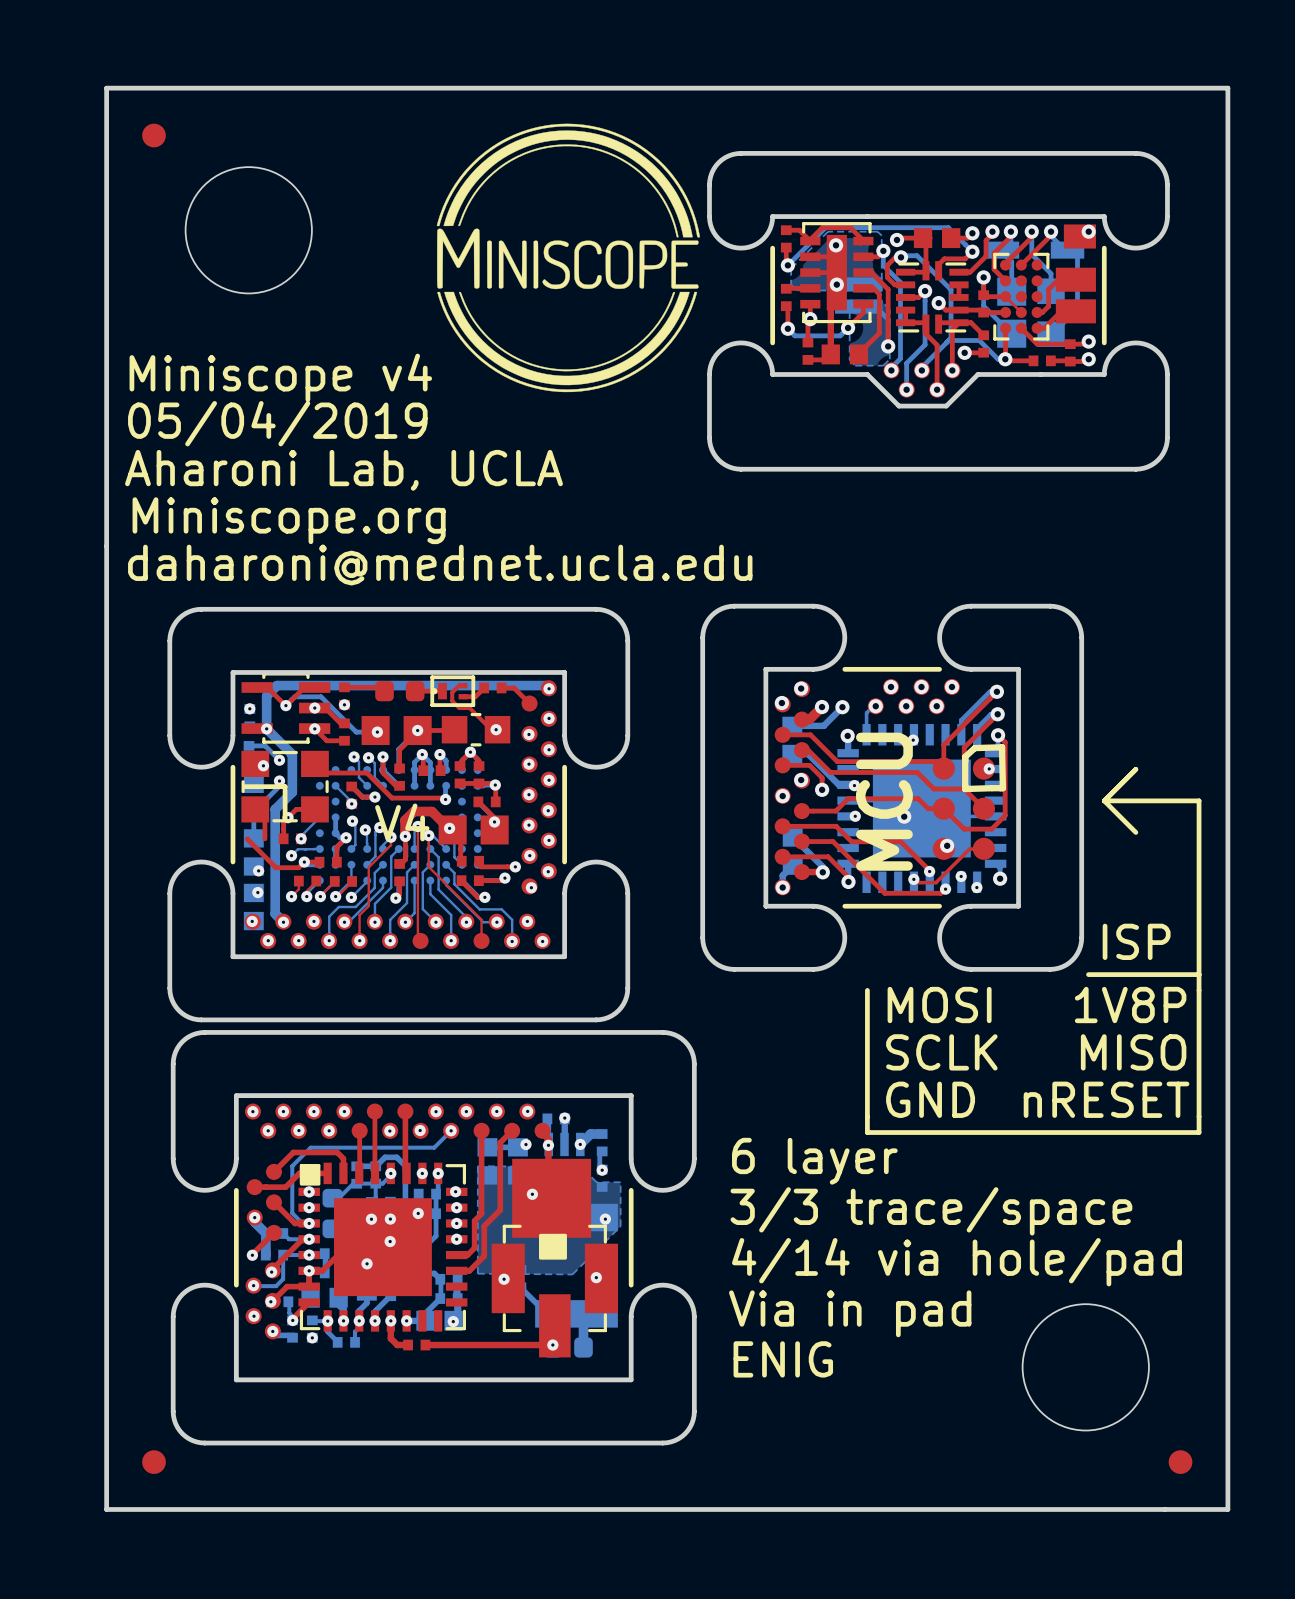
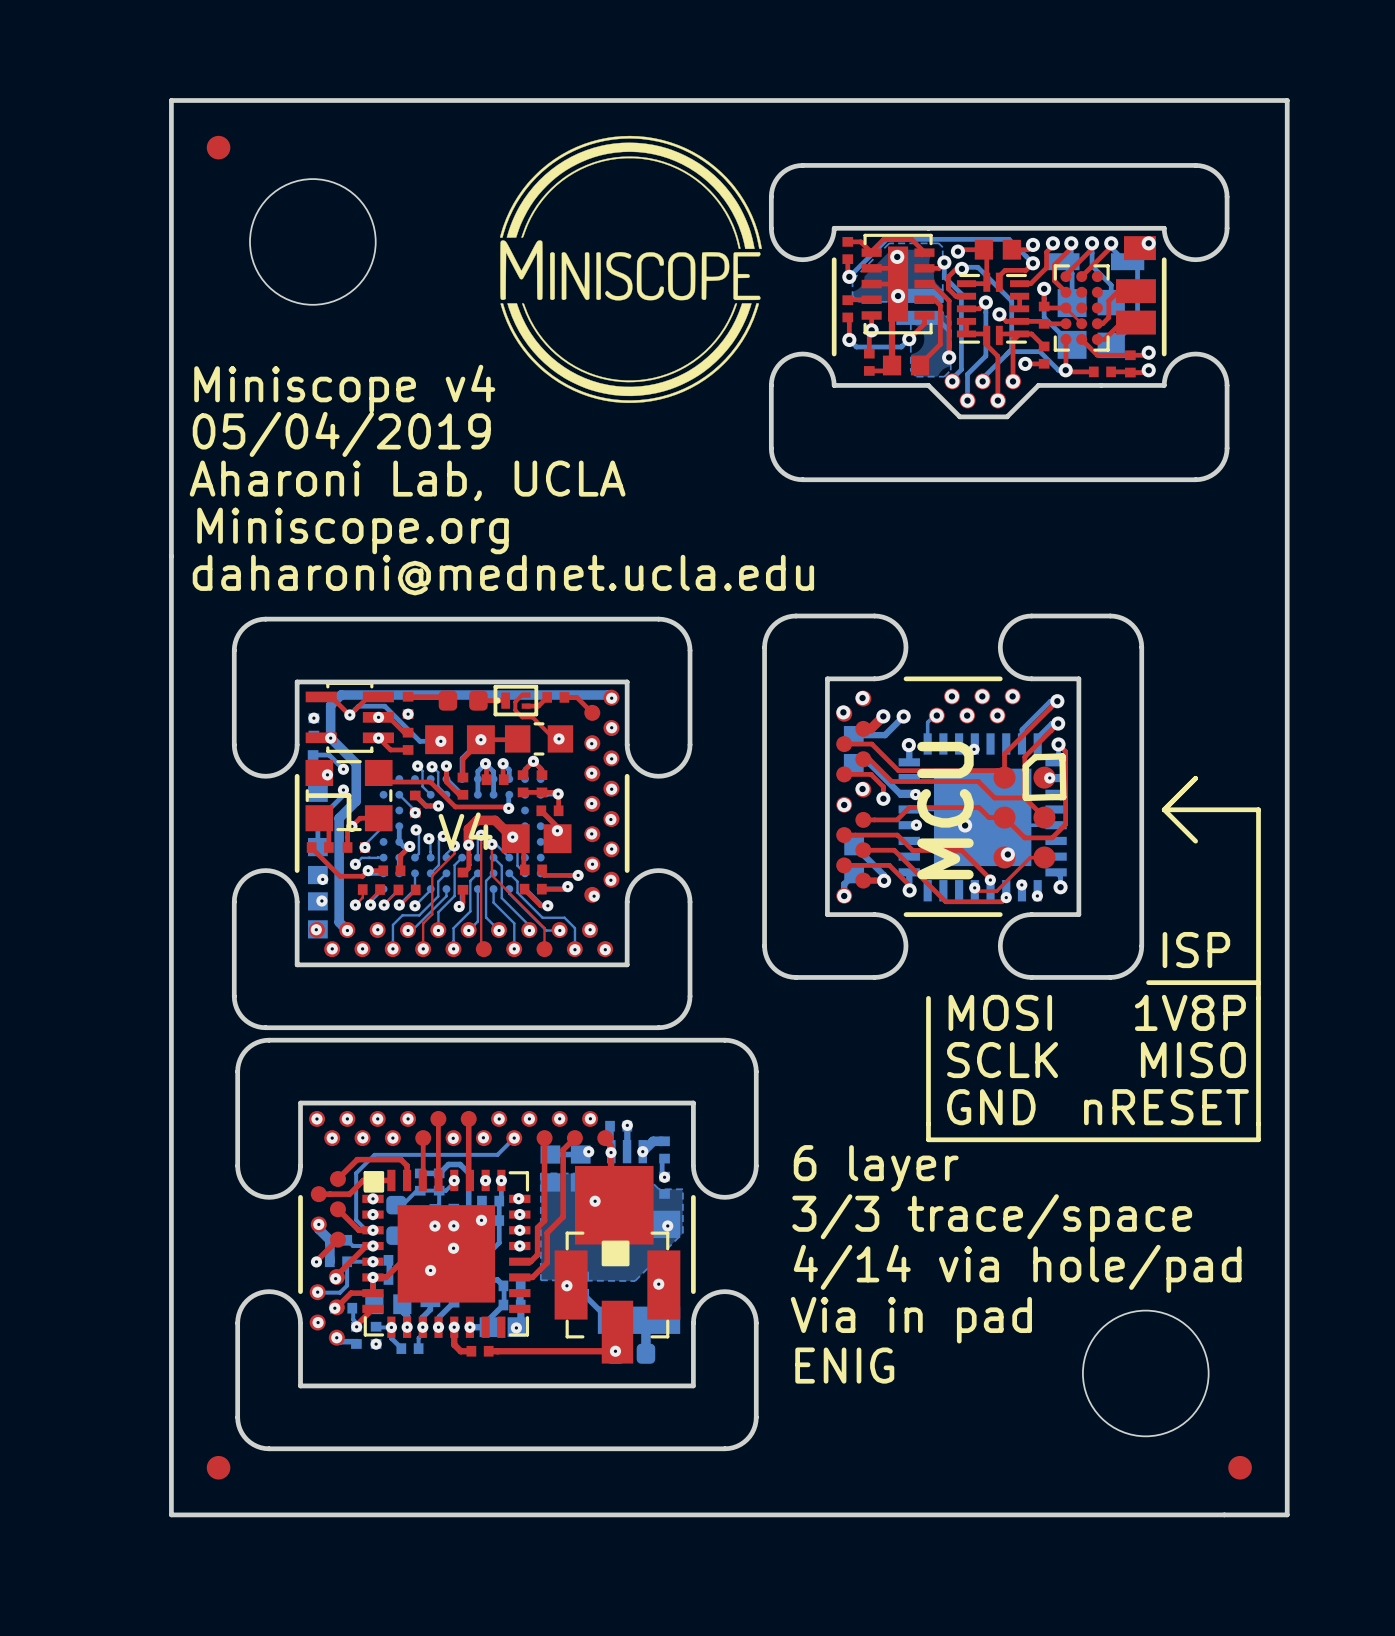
part: none -> (320, 847)

